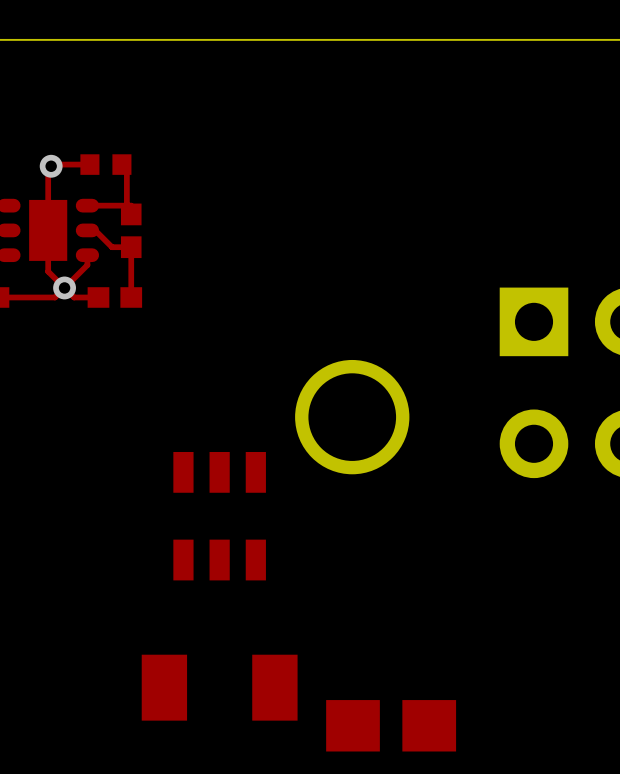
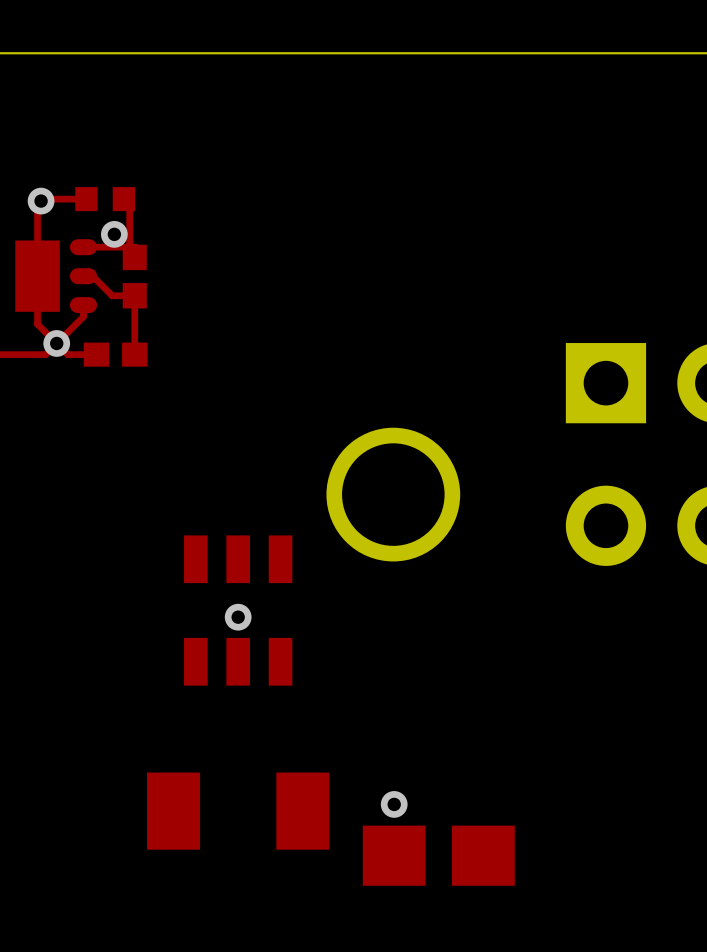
via: none -> (114, 234)
via: none -> (238, 617)
via: none -> (394, 804)

